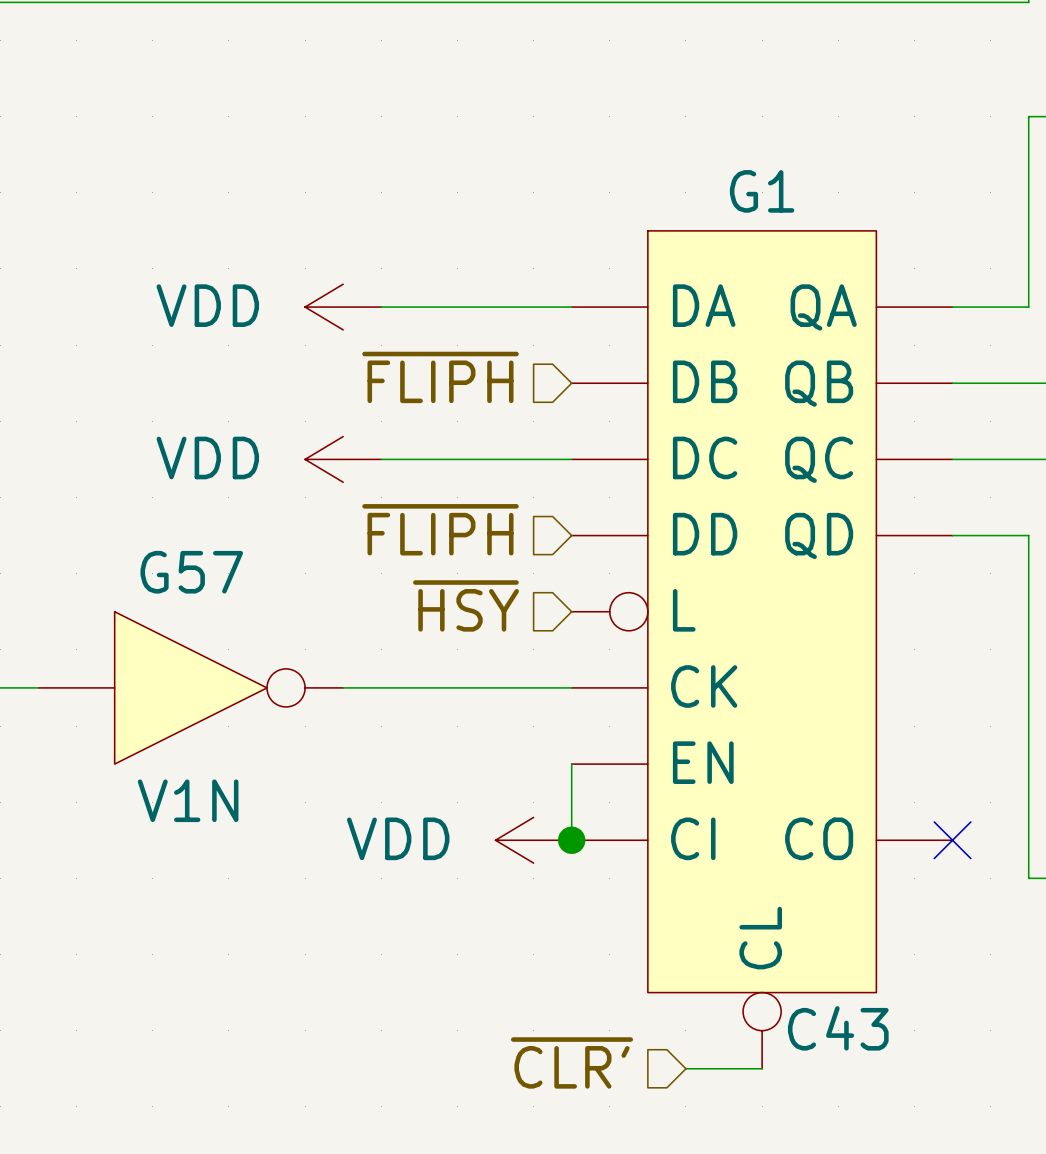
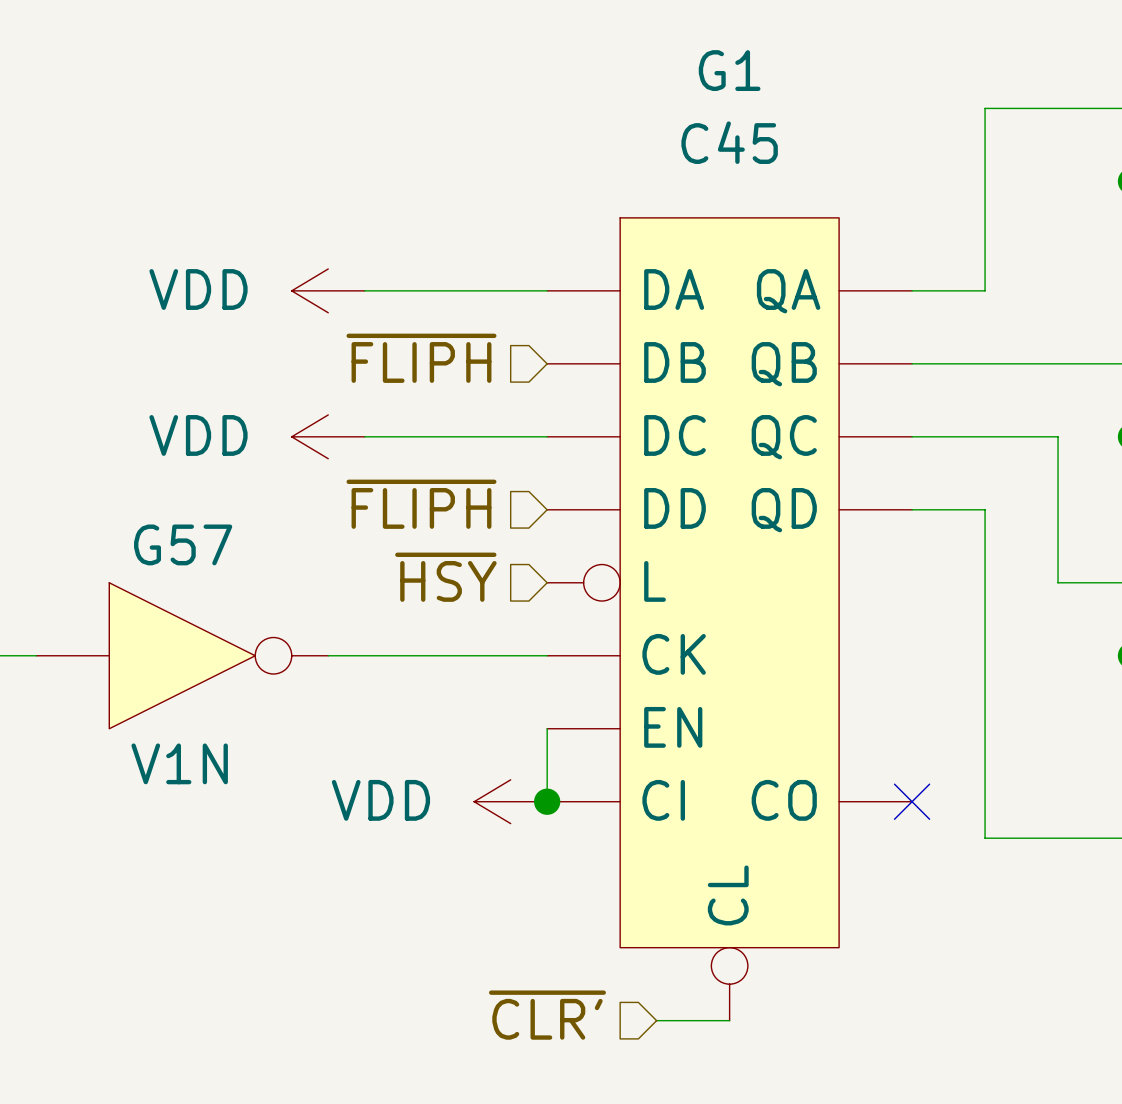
G1 name position: G1 (762, 191) -> G1 (729, 70)
G1 value: C43 (838, 1028) -> C45 (729, 142)

